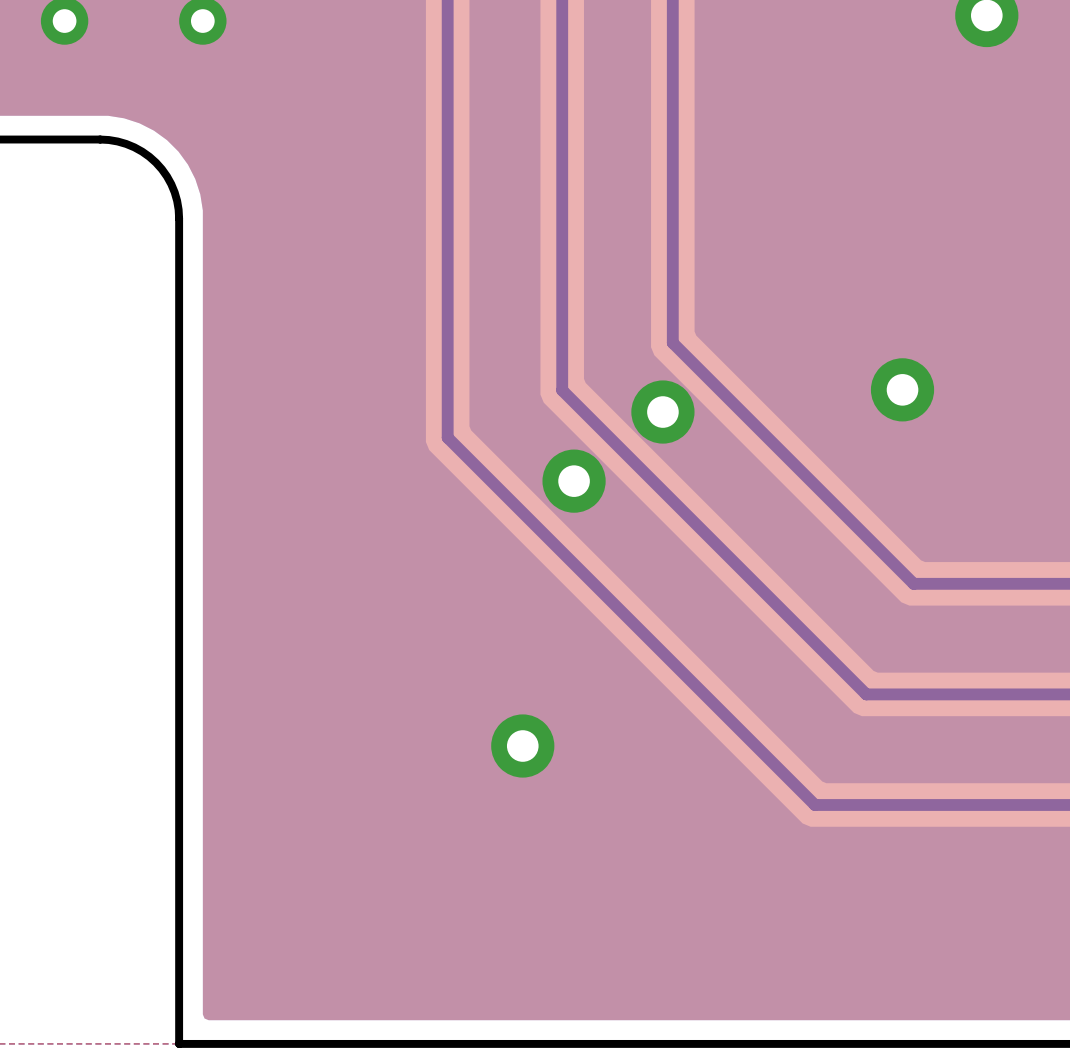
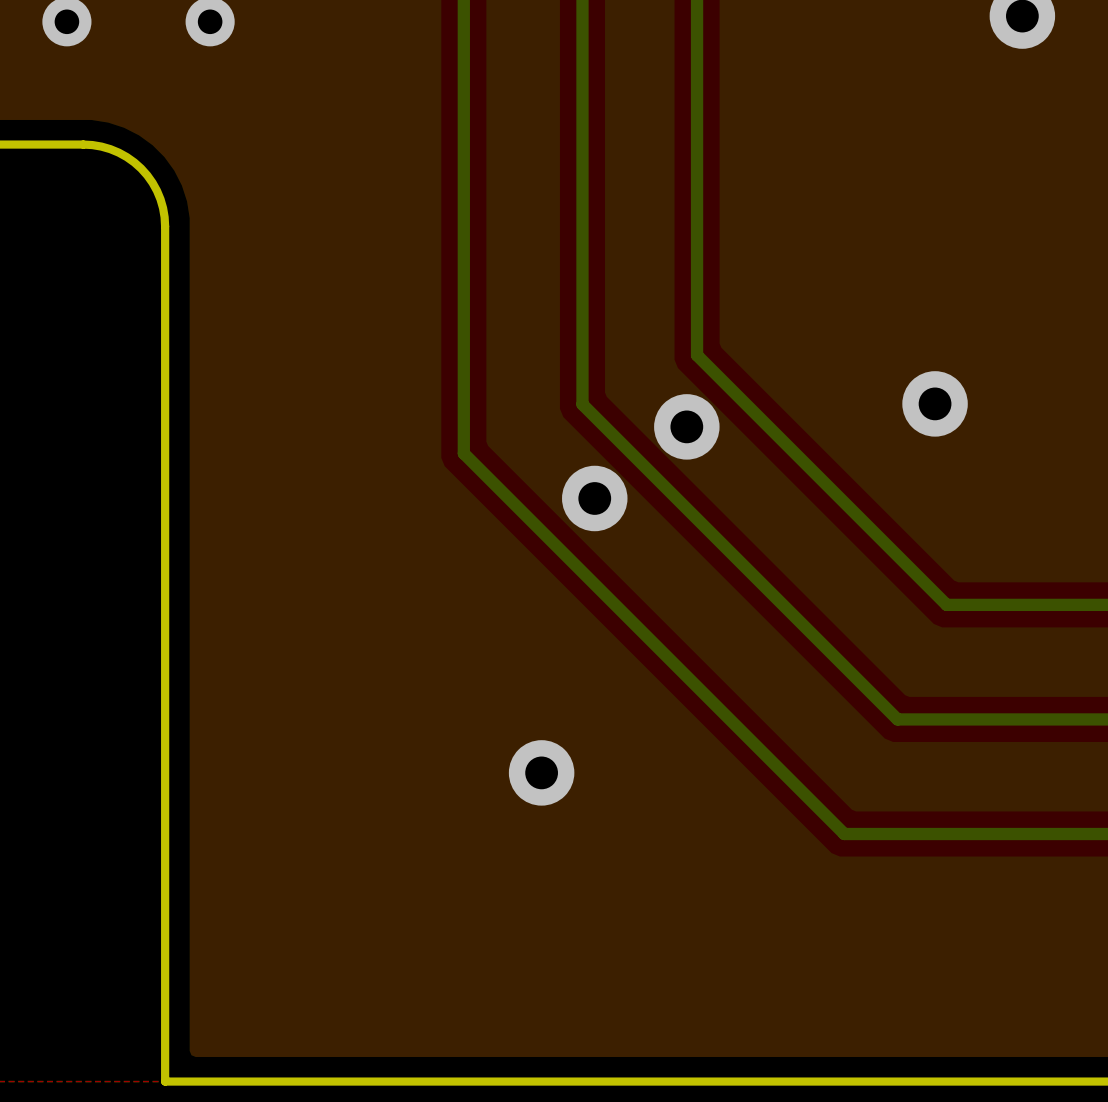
board edge: (80, 139) (117, 141) (134, 147) (149, 156) (161, 169) (171, 184) (178, 209) (179, 1043) -> (83, 144) (101, 146) (118, 152) (141, 168) (157, 190) (164, 217) (165, 1081) (185, 1081)

